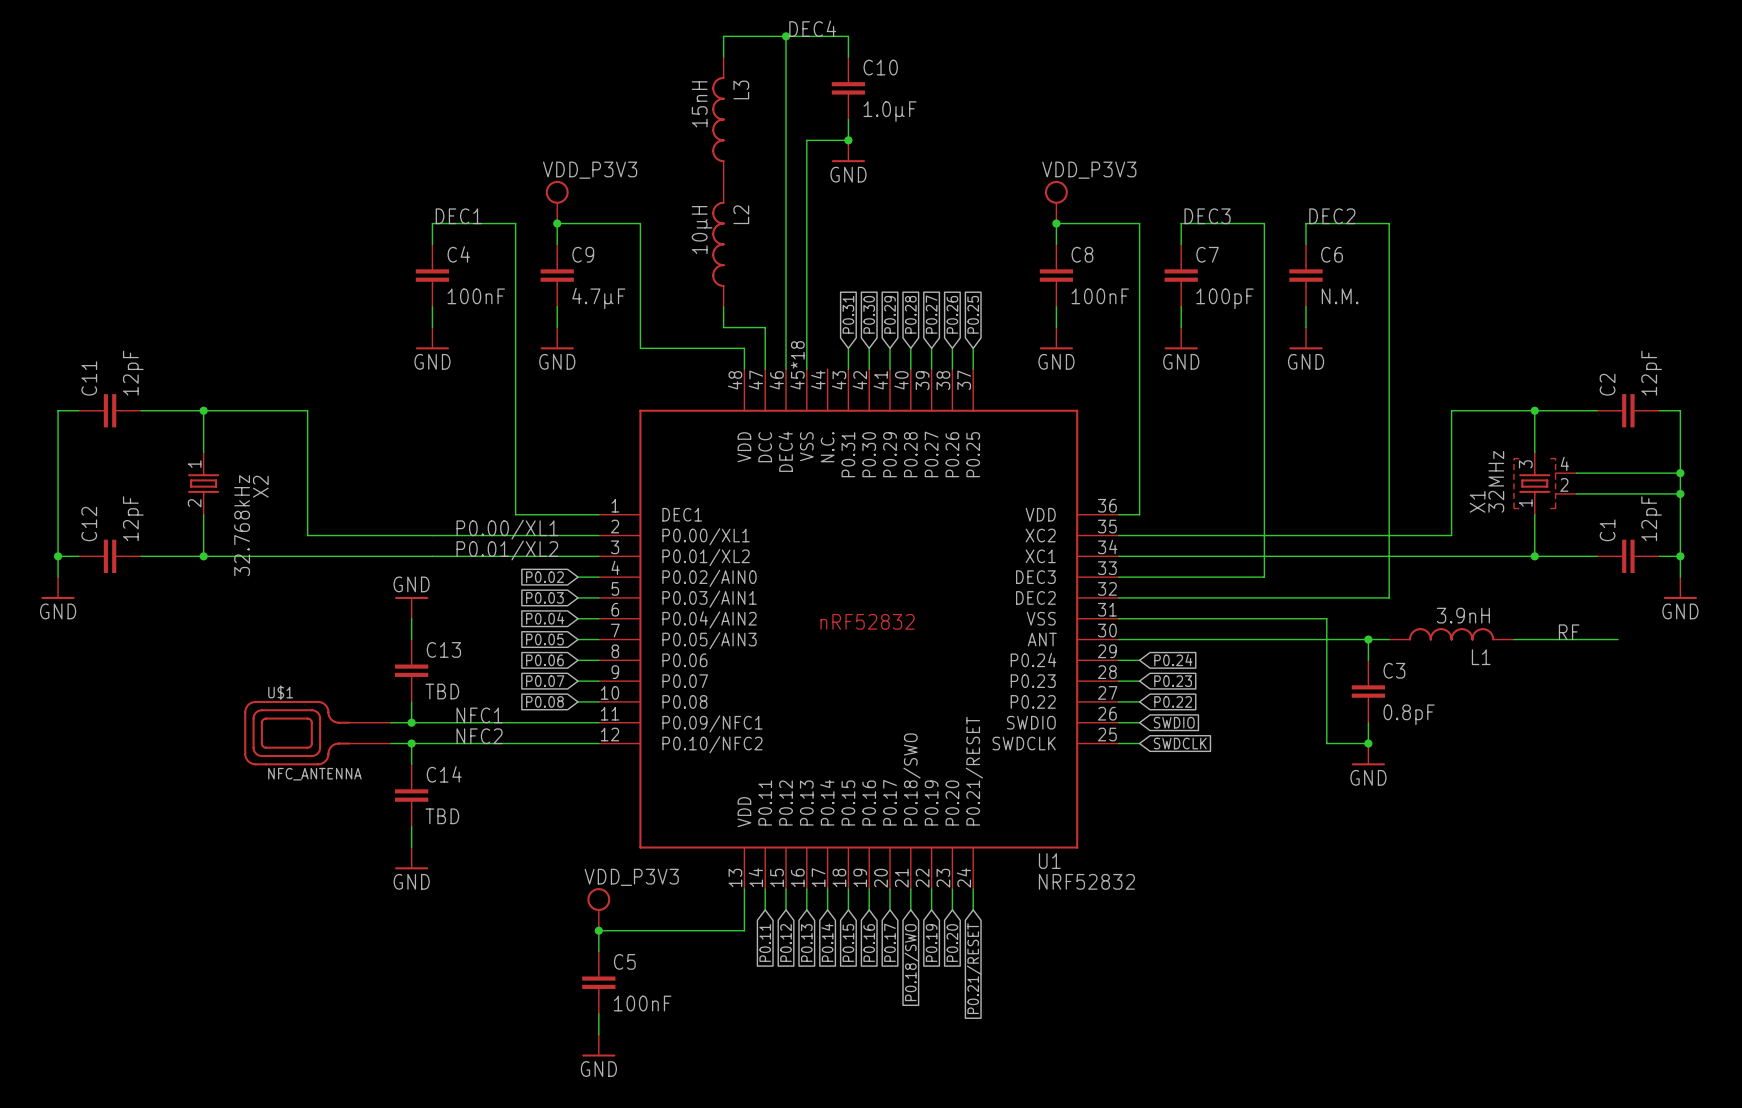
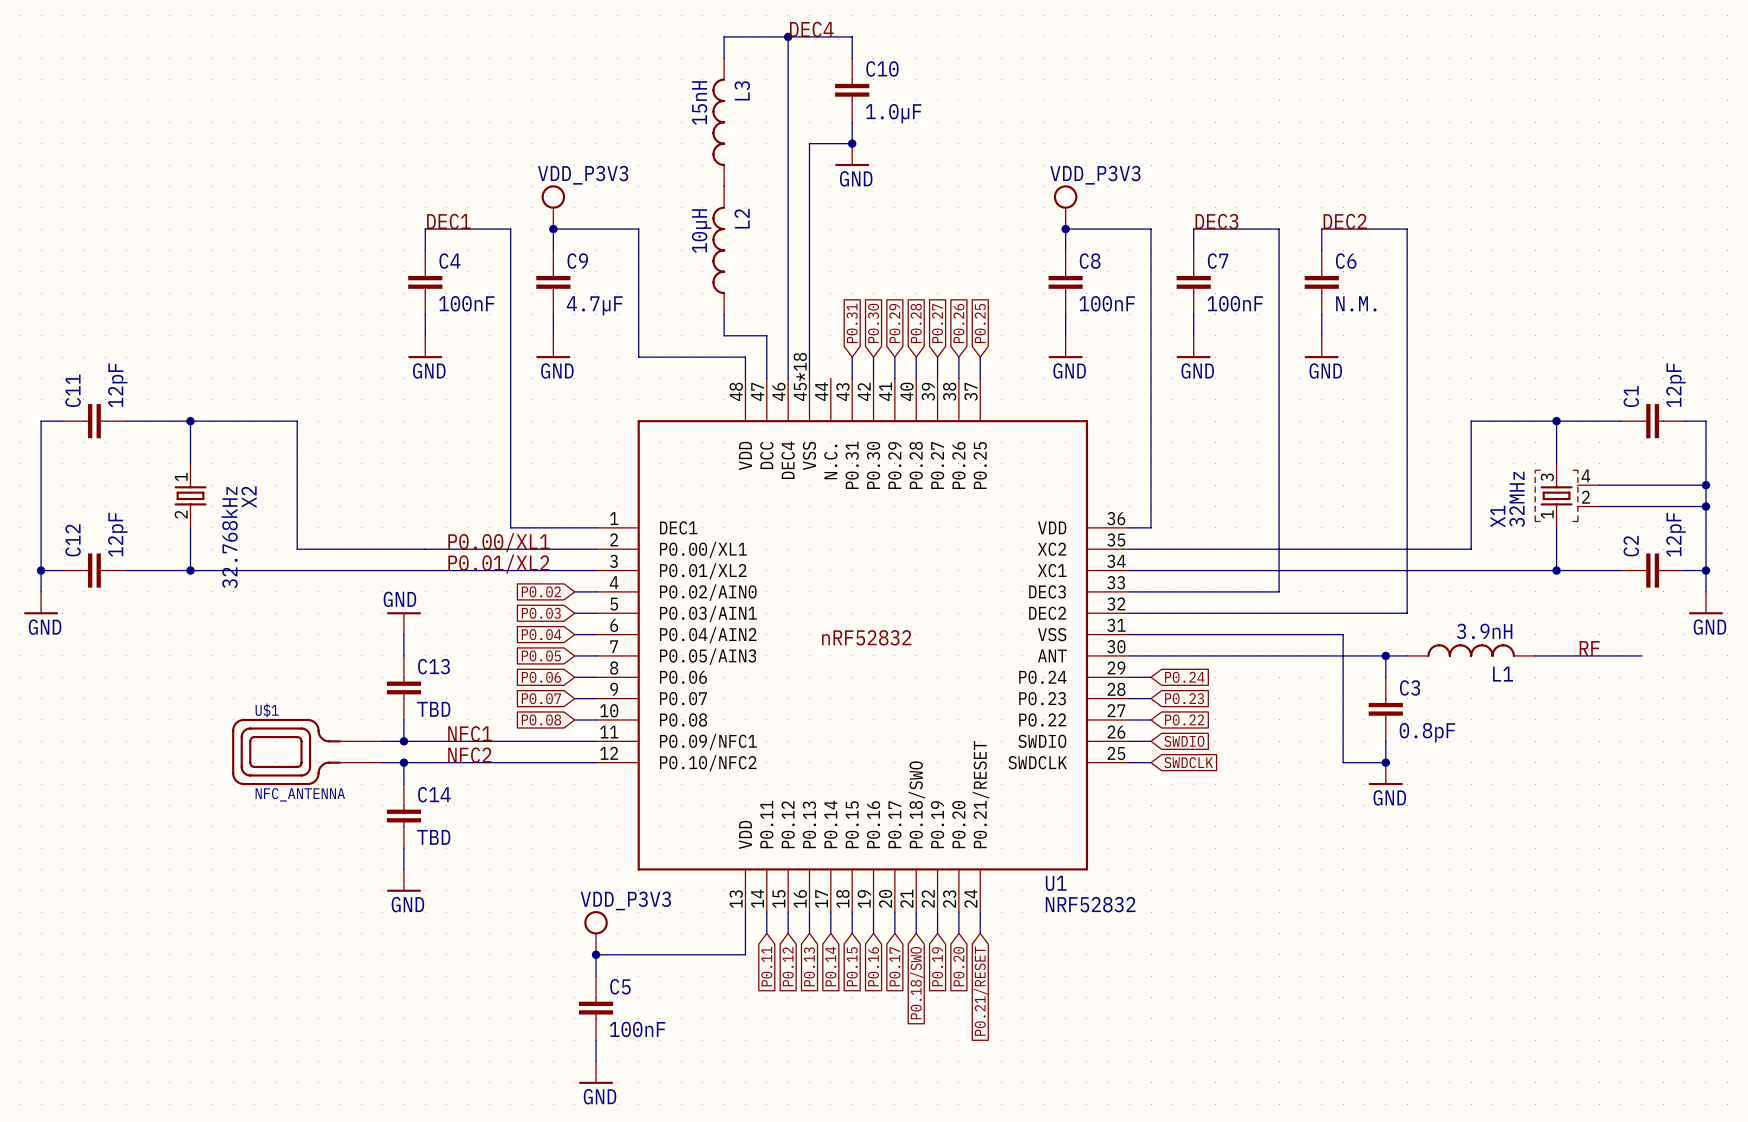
C7 value: 100pF (1225, 298) -> 100nF (1235, 303)
C2 name: C2 (1607, 384) -> C1 (1631, 396)
C1 name: C1 (1607, 530) -> C2 (1631, 546)

